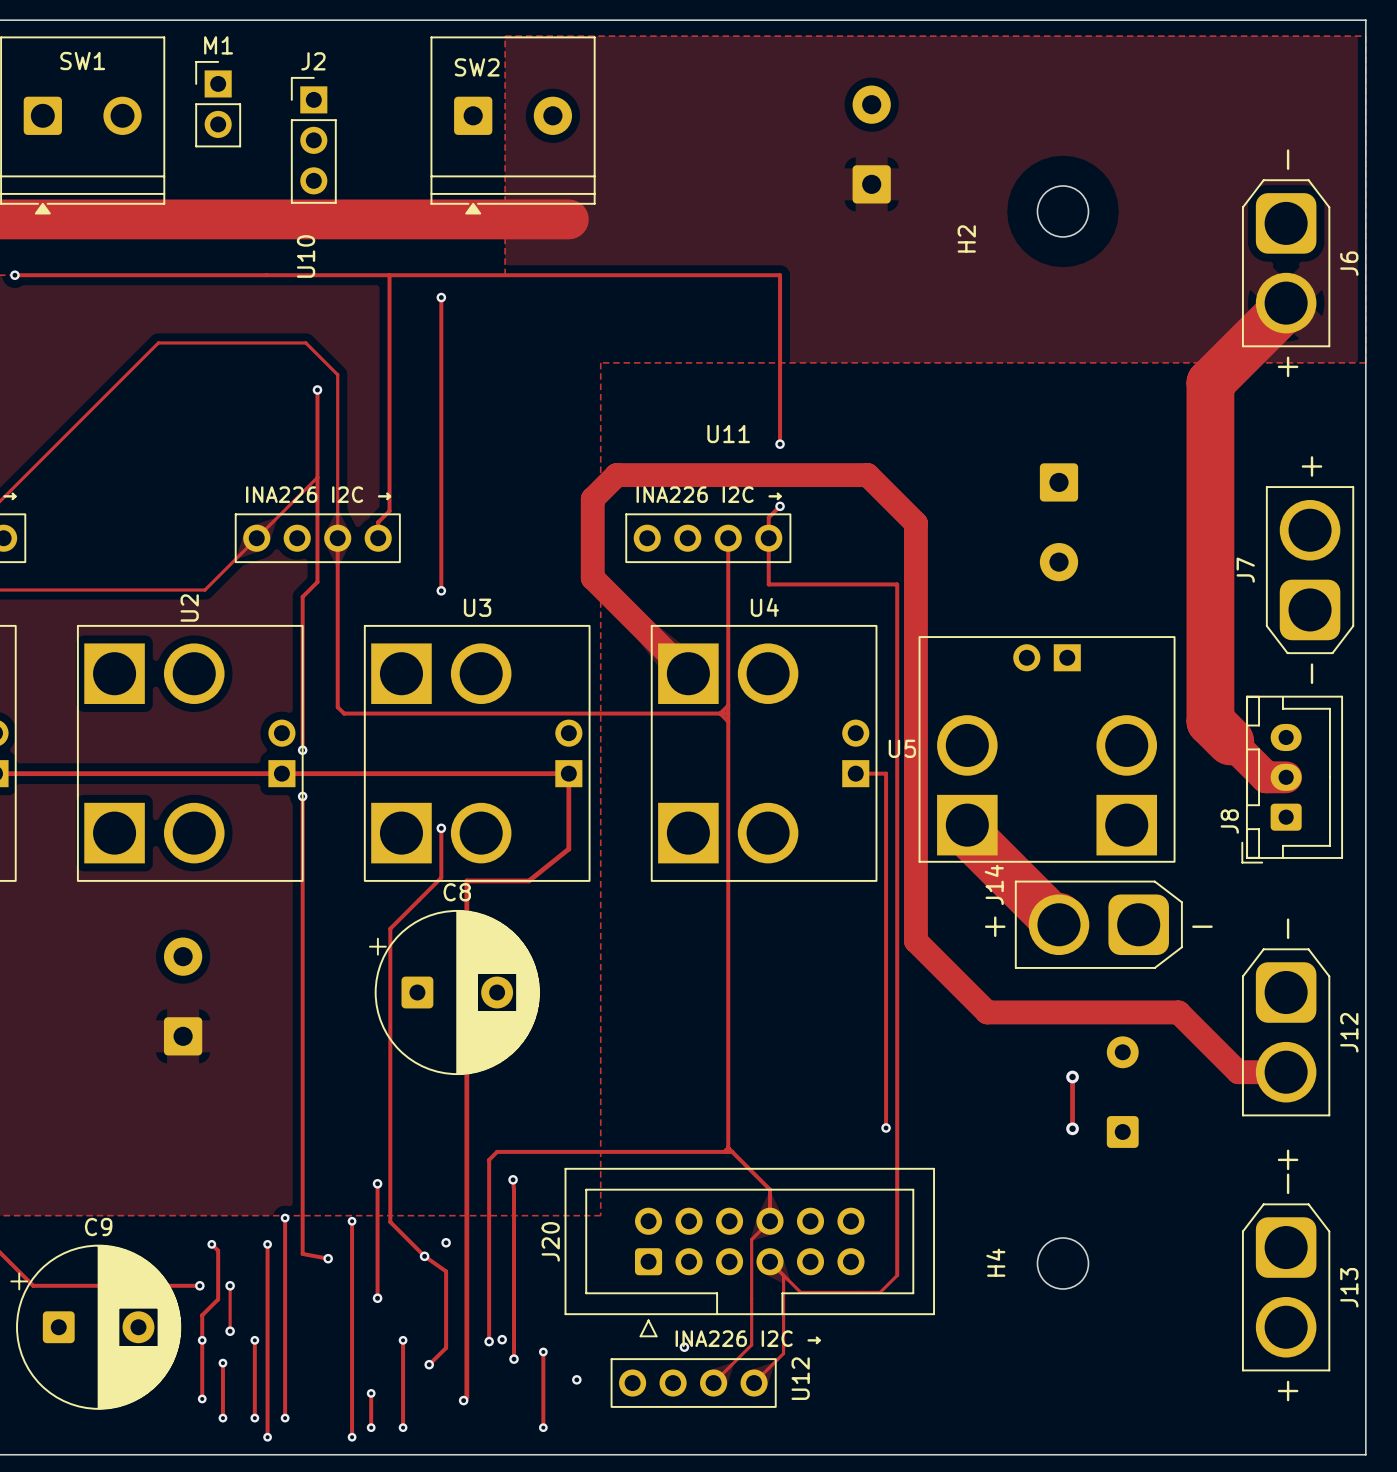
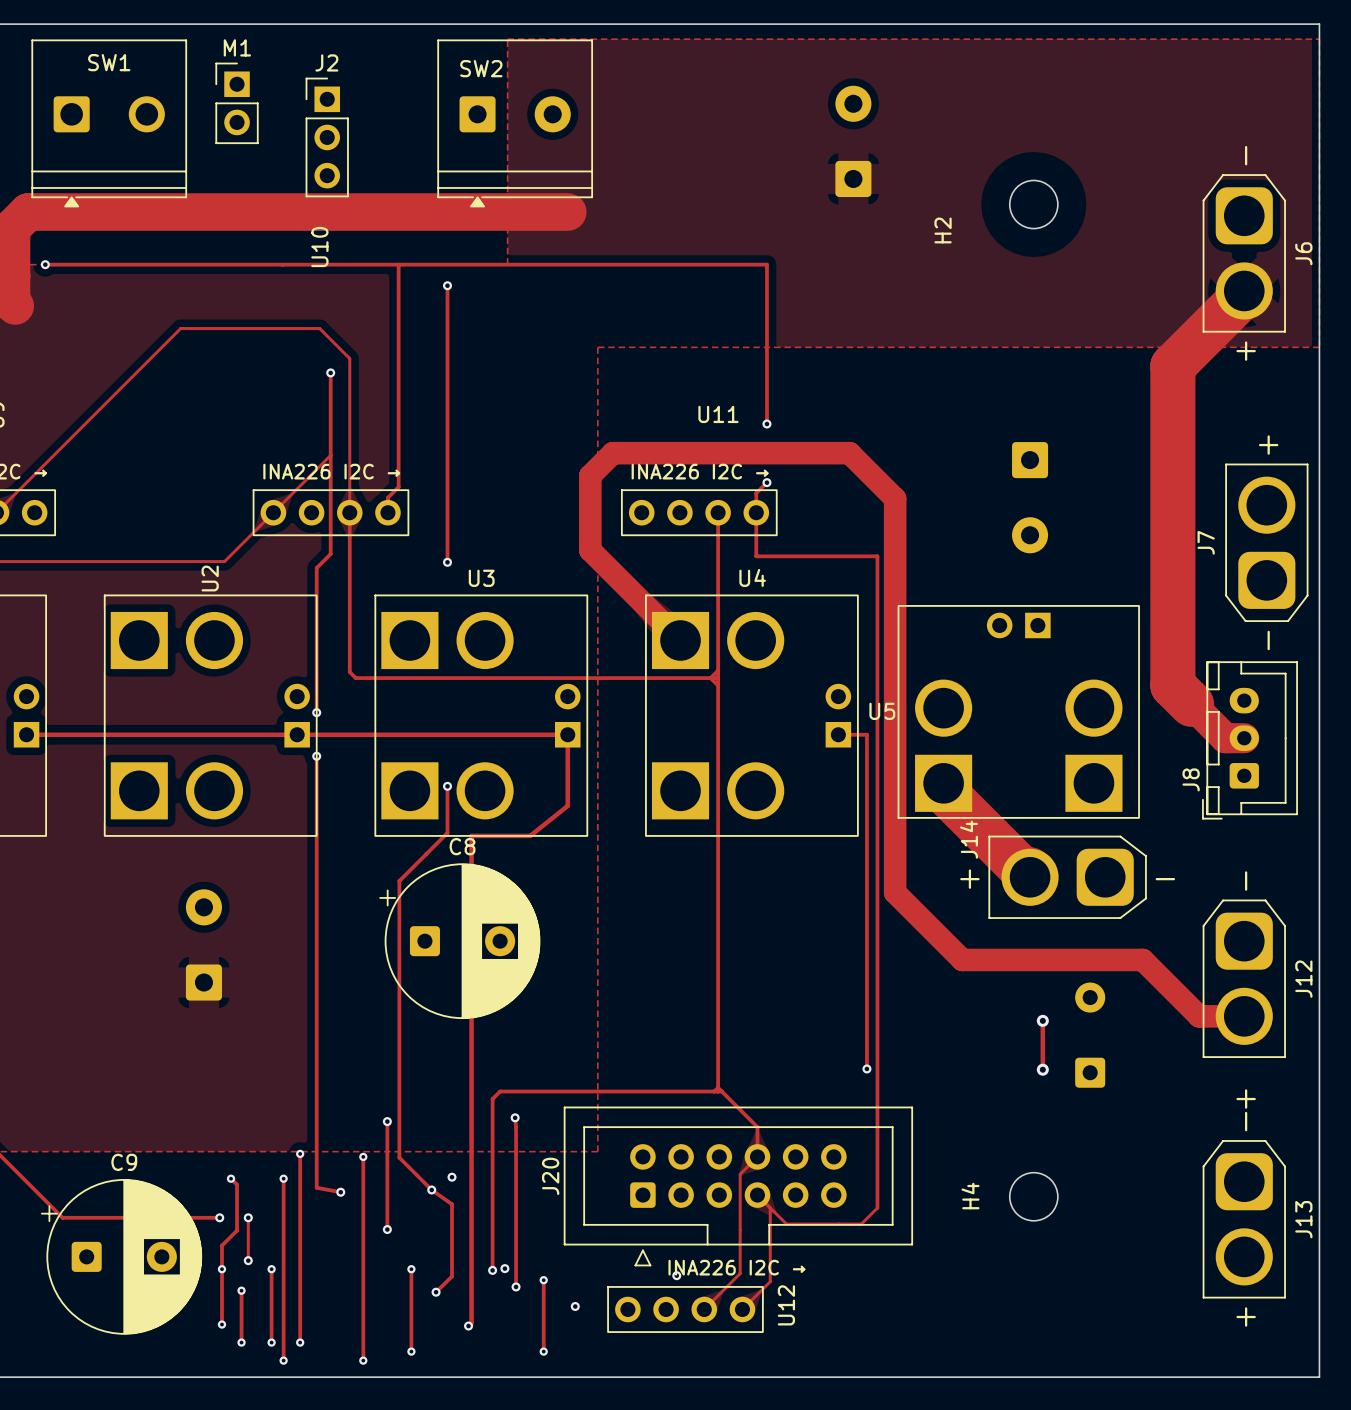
track: (371, 1393) (371, 1427) -> none
via: (371, 1393) -> none
via: (371, 1427) -> none

